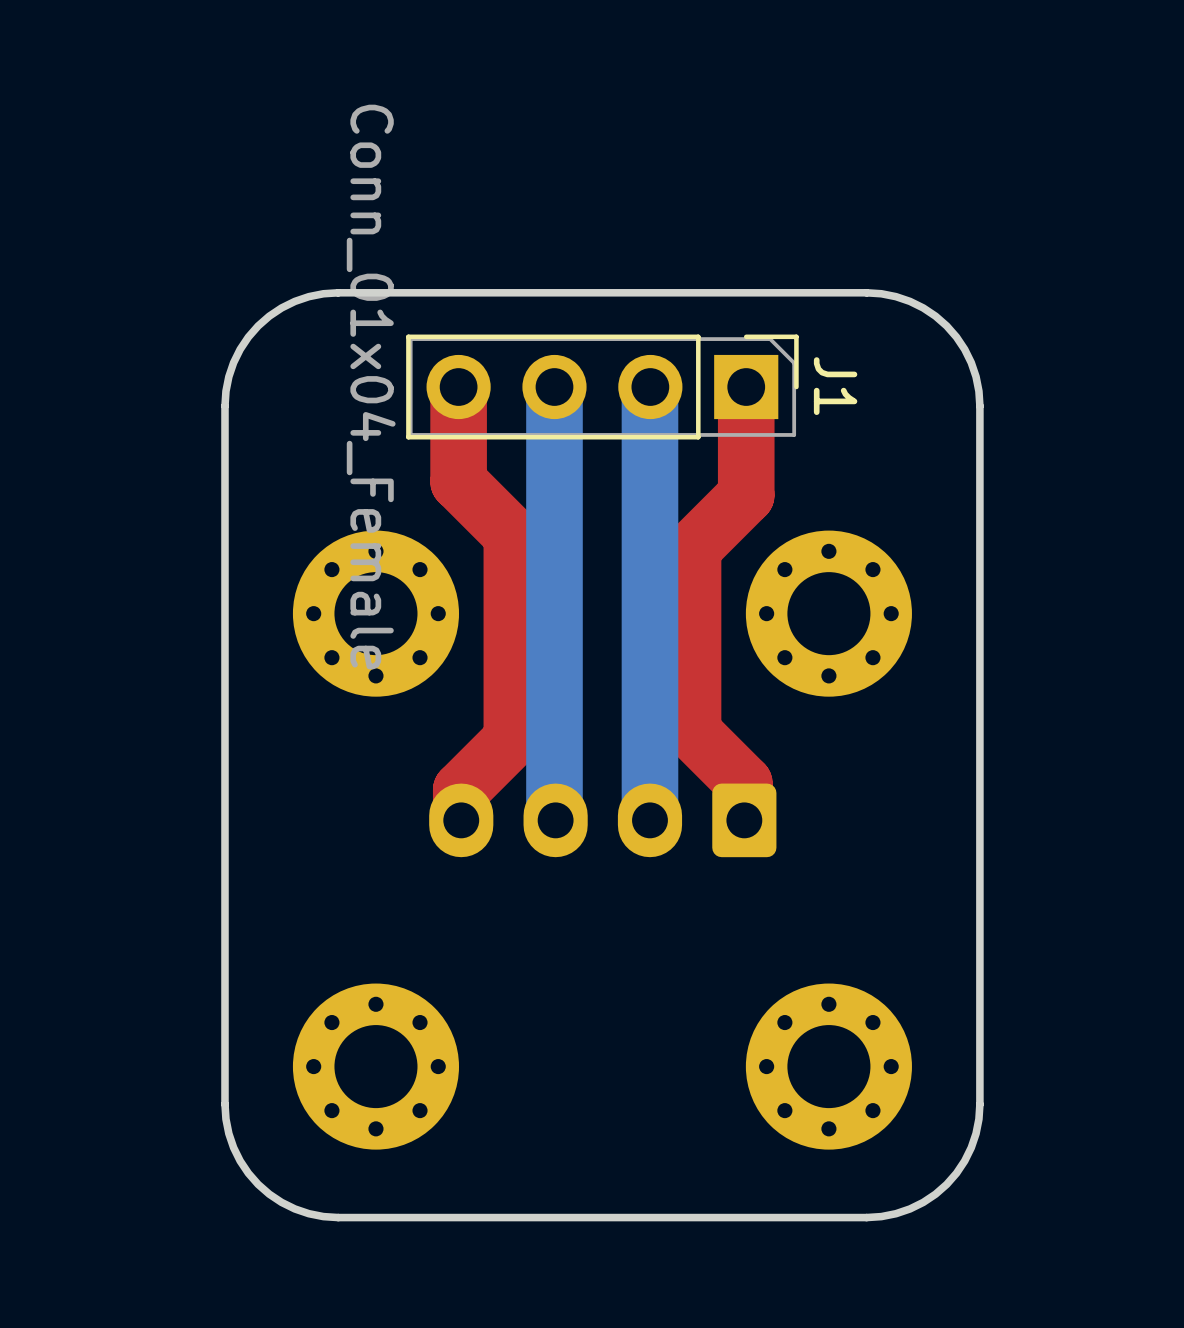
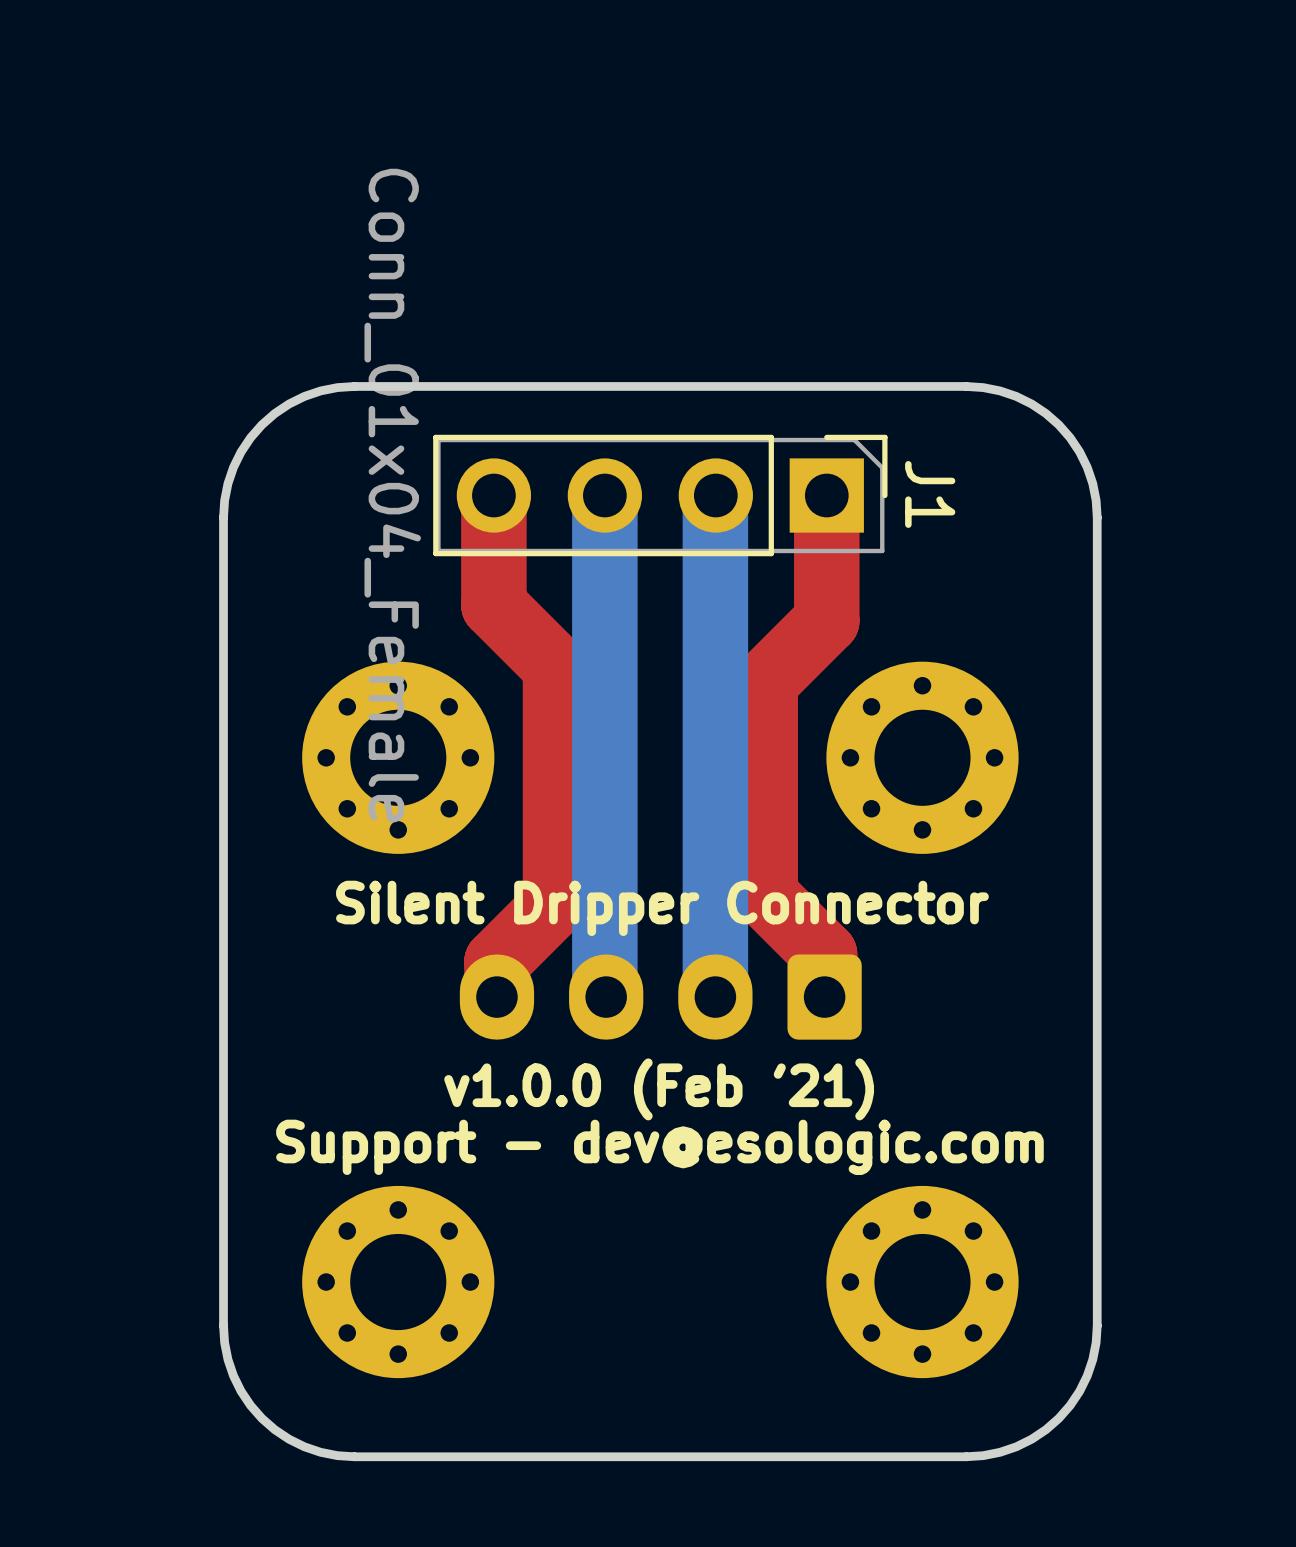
text: none -> Silent Dripper Connector (662, 908)
text: none -> v1.0.0 (Feb '21) (659, 1089)
text: none -> Support - dev@esologic.com (659, 1147)

